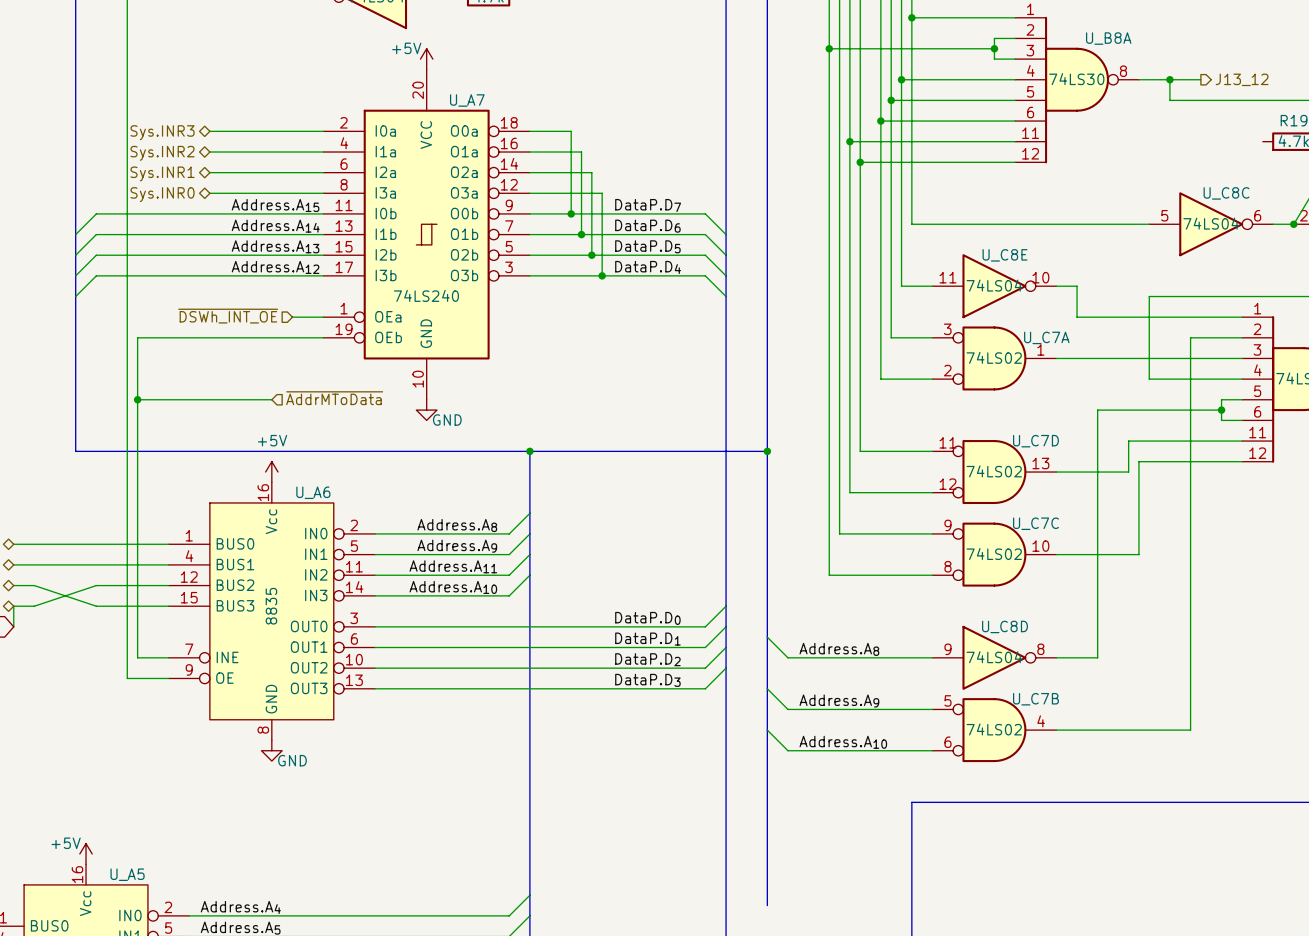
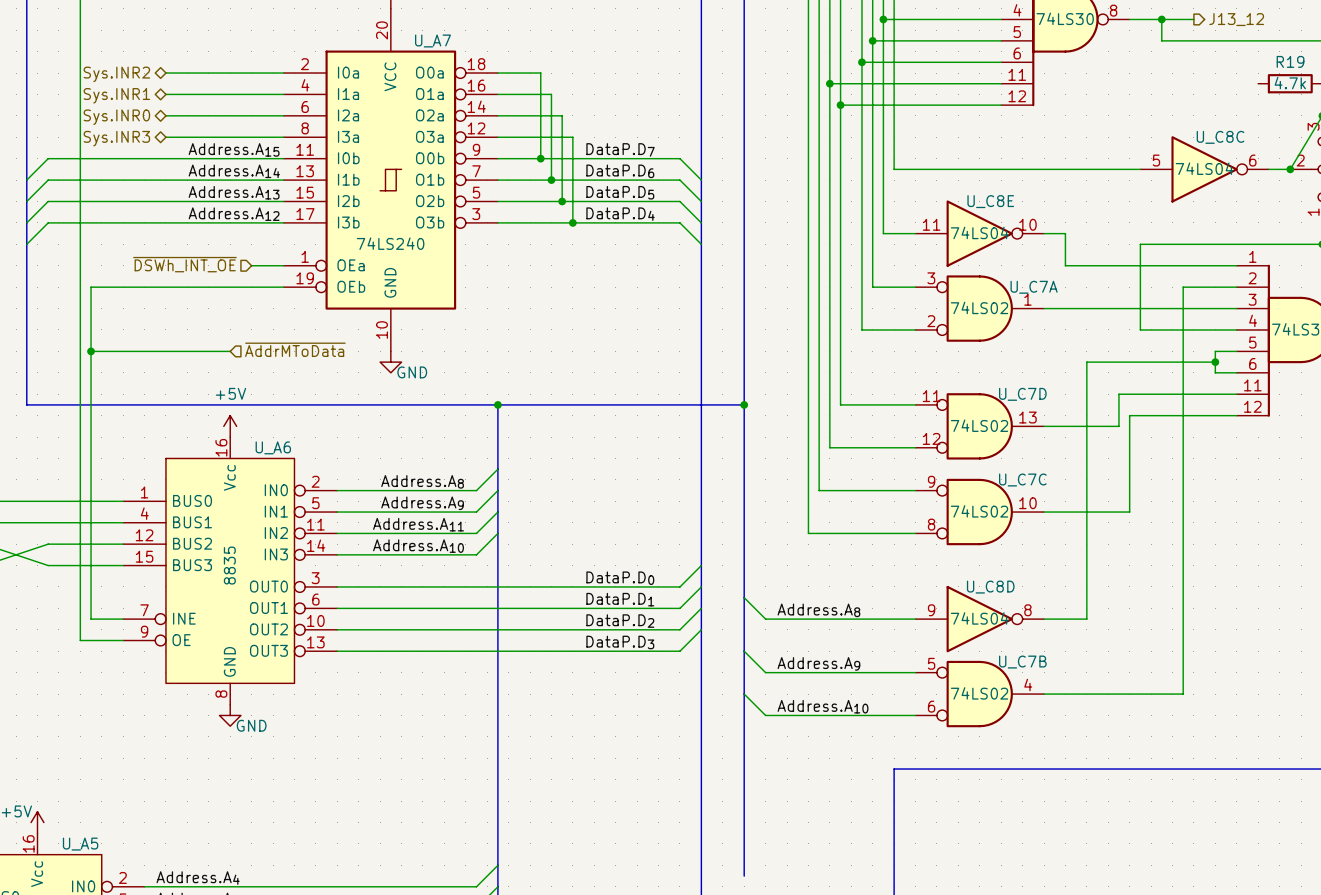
hierarchical label: Sys.INR3 (162, 132) -> Sys.INR2 (116, 74)
hierarchical label: Sys.INR2 (162, 153) -> Sys.INR1 (116, 95)
hierarchical label: Sys.INR1 (162, 173) -> Sys.INR0 (116, 117)
hierarchical label: Sys.INR0 (162, 194) -> Sys.INR3 (116, 138)

